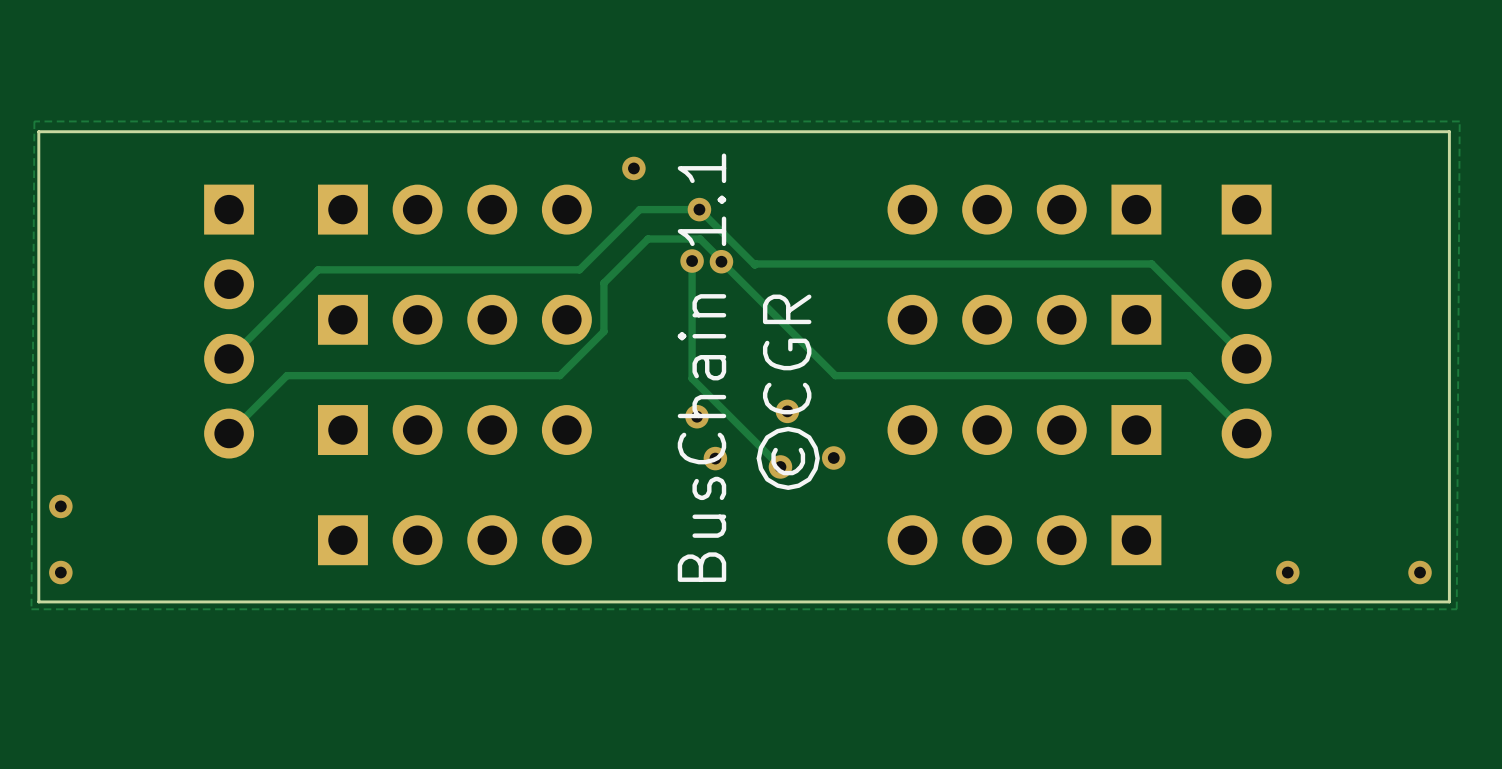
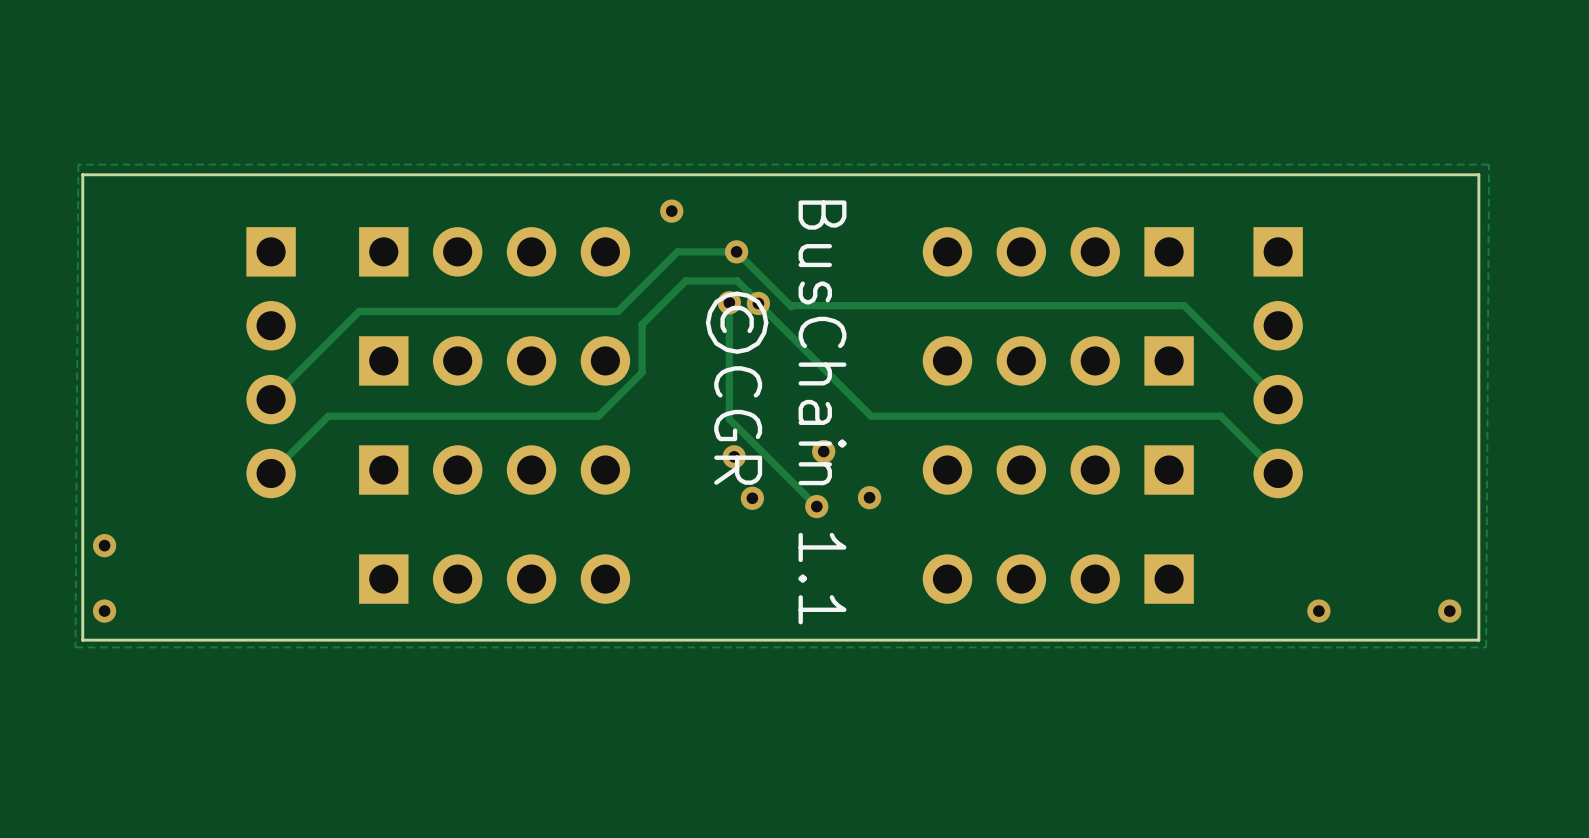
text rotation: 0° (701, 367) -> 180° (822, 412)
text rotation: 0° (788, 392) -> 180° (737, 388)

